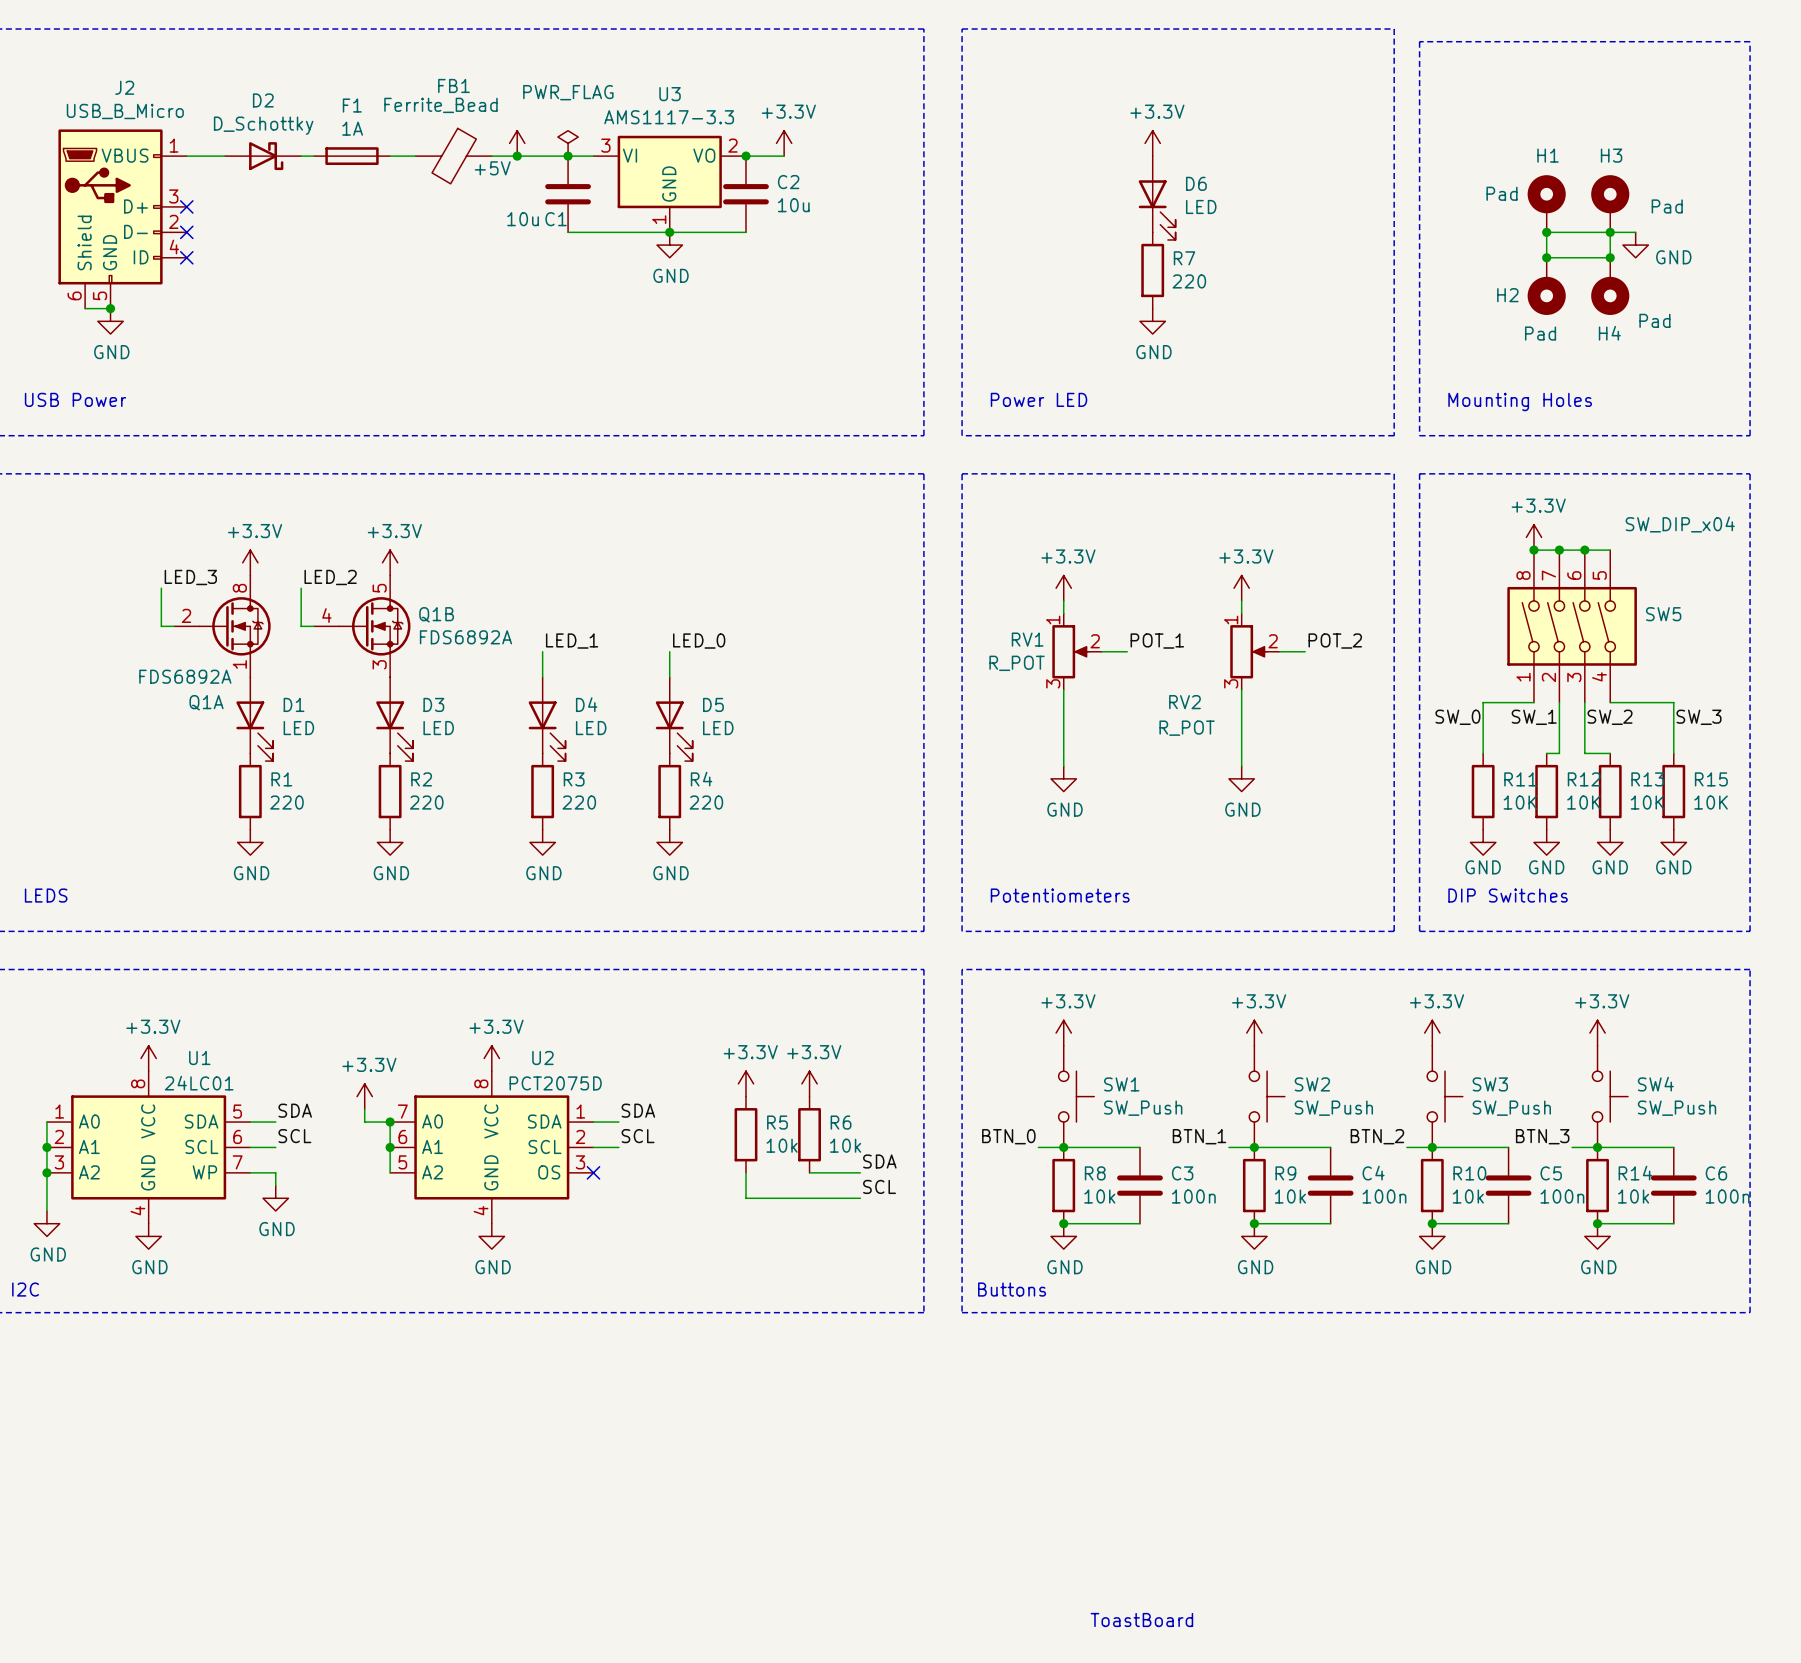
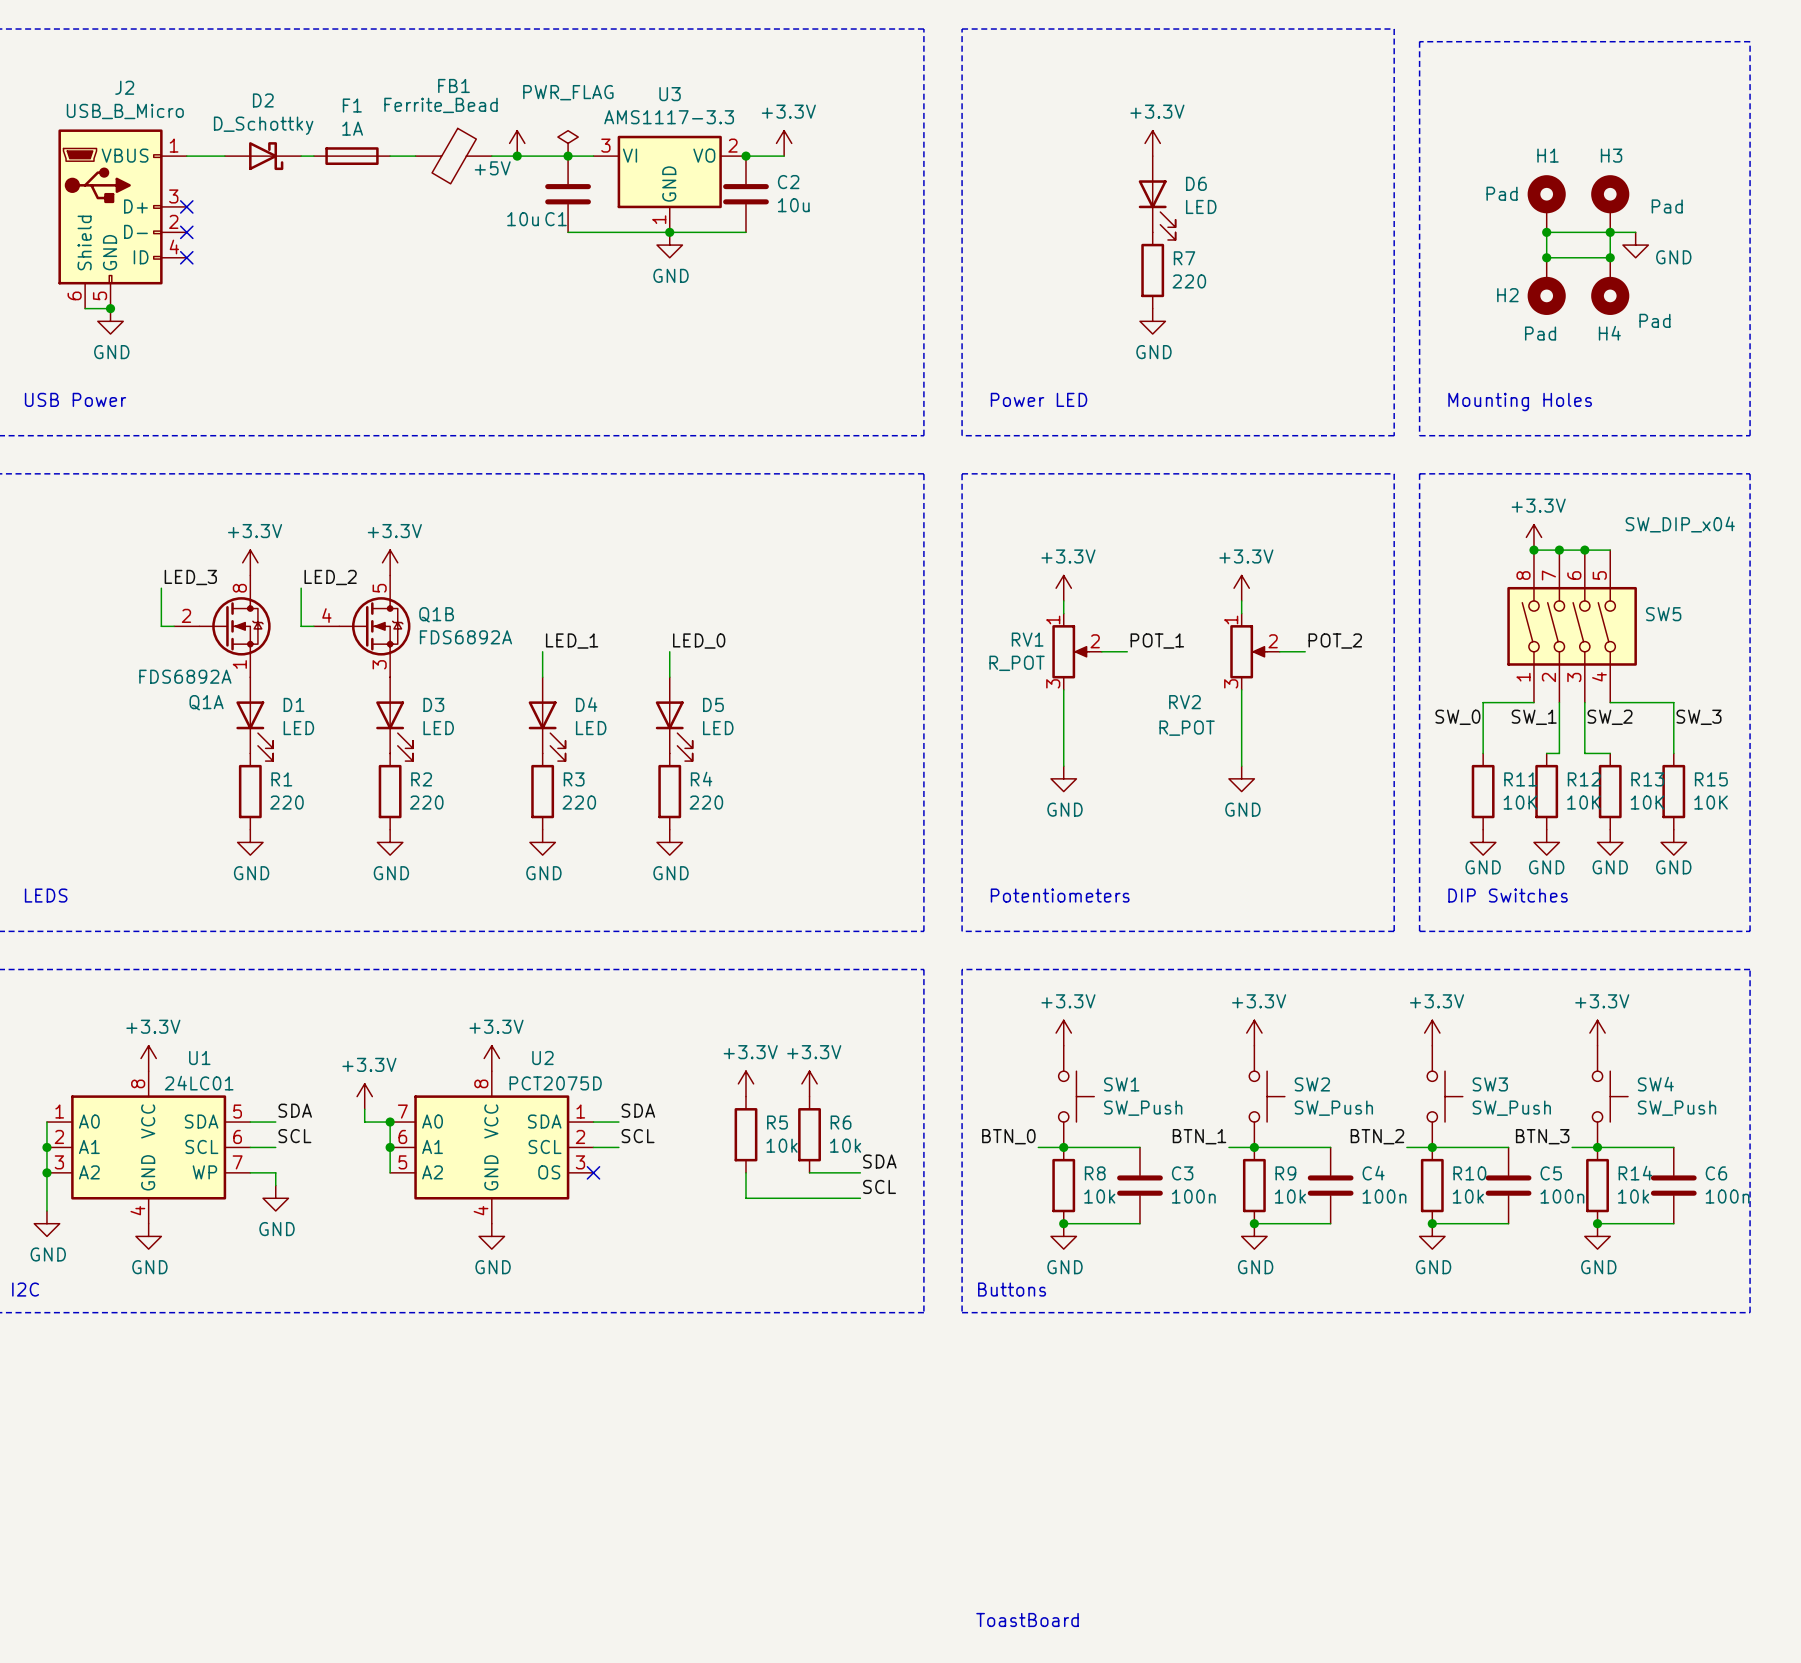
text position: ToastBoard (1141, 1619) -> ToastBoard (1027, 1619)

